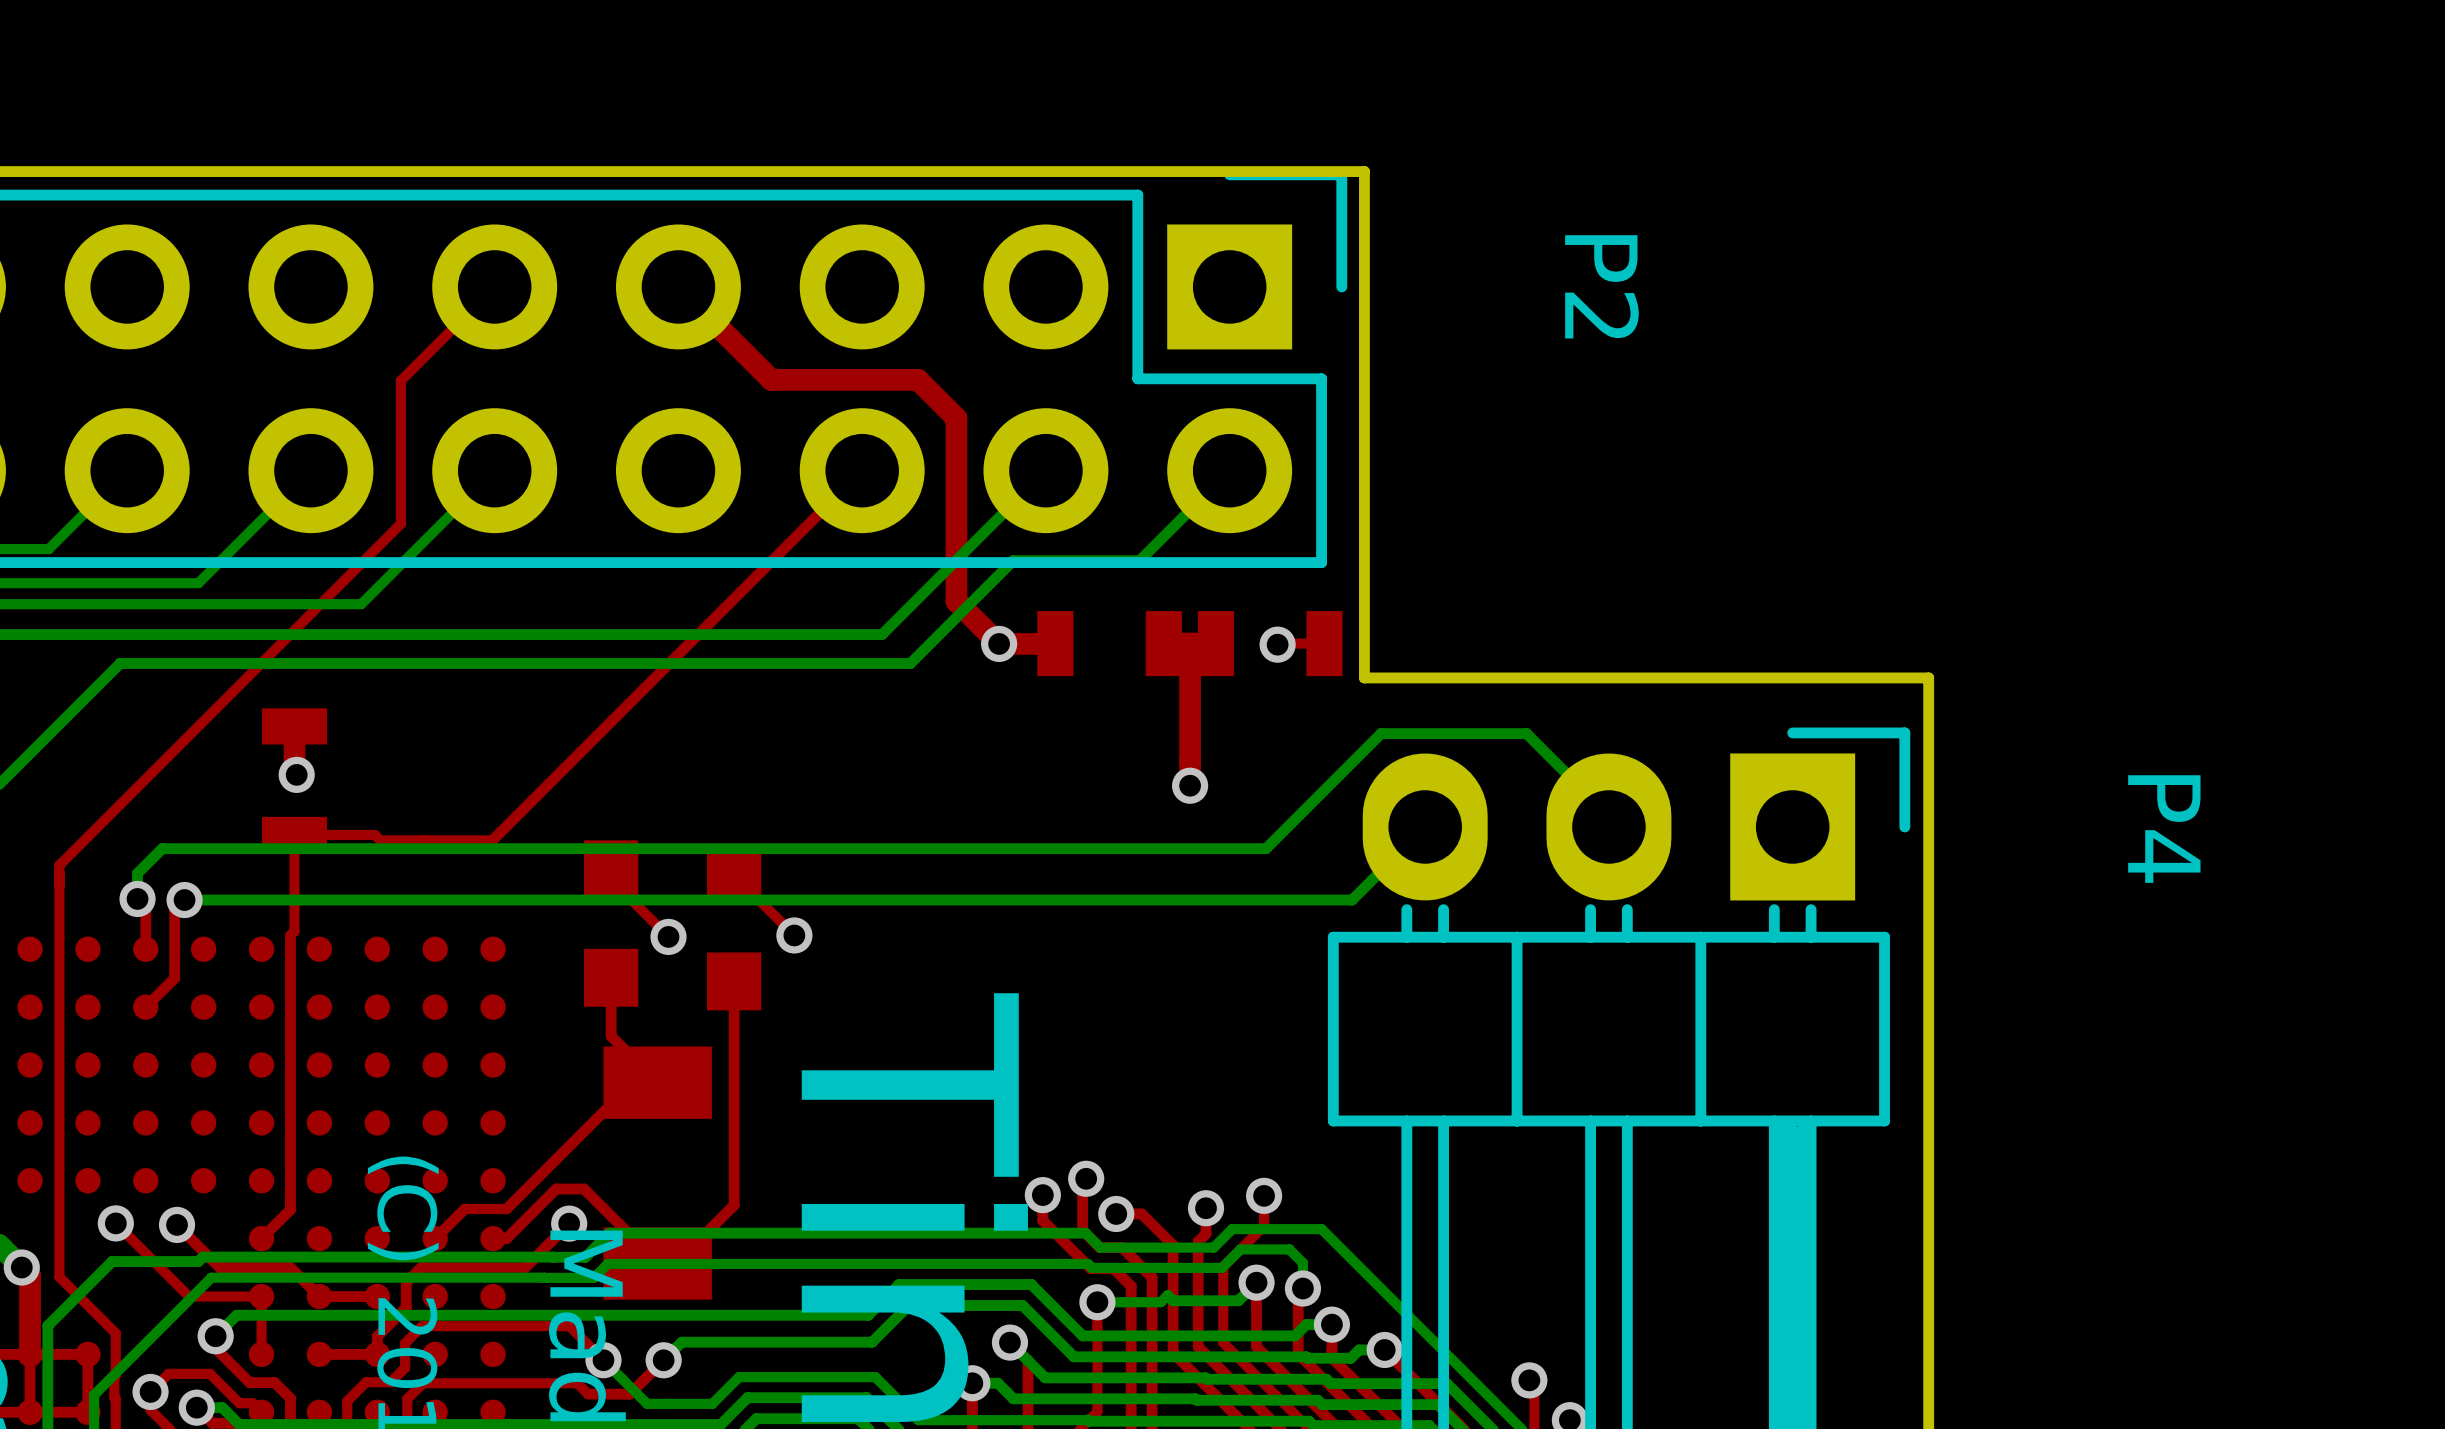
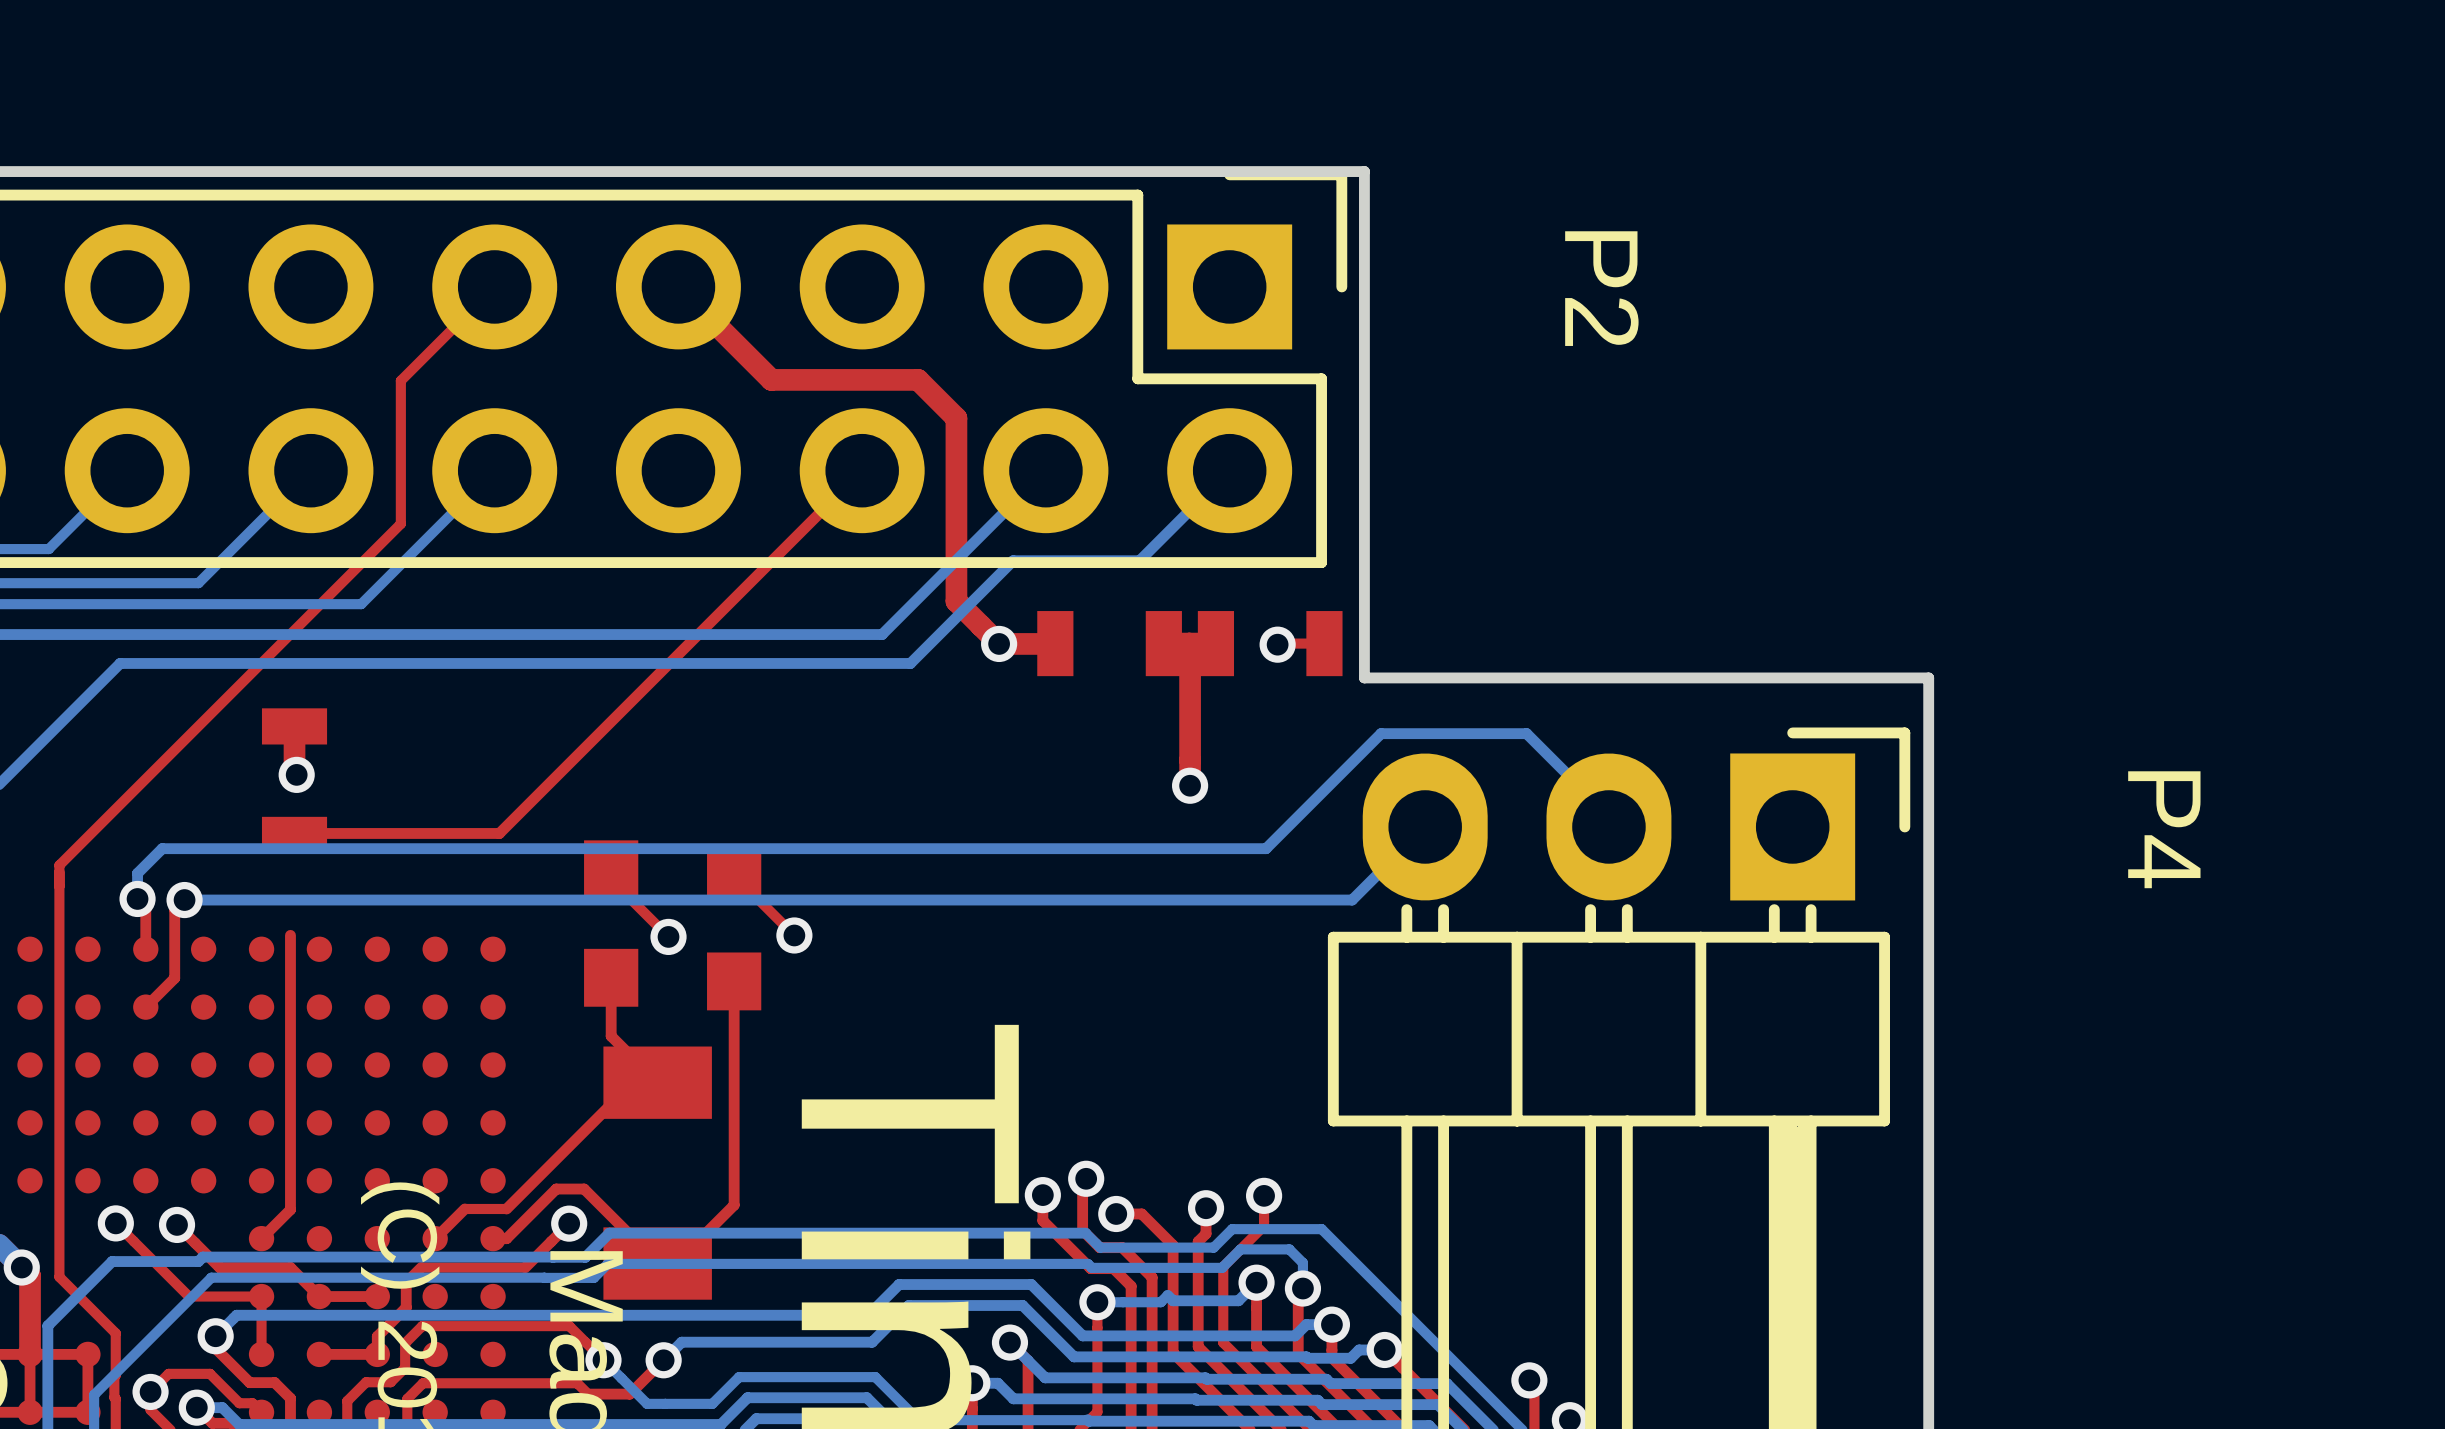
top track: (499, 833) (492, 840) (380, 840) (374, 834) (294, 834) (294, 931) (290, 935) -> (499, 833) (309, 834)

